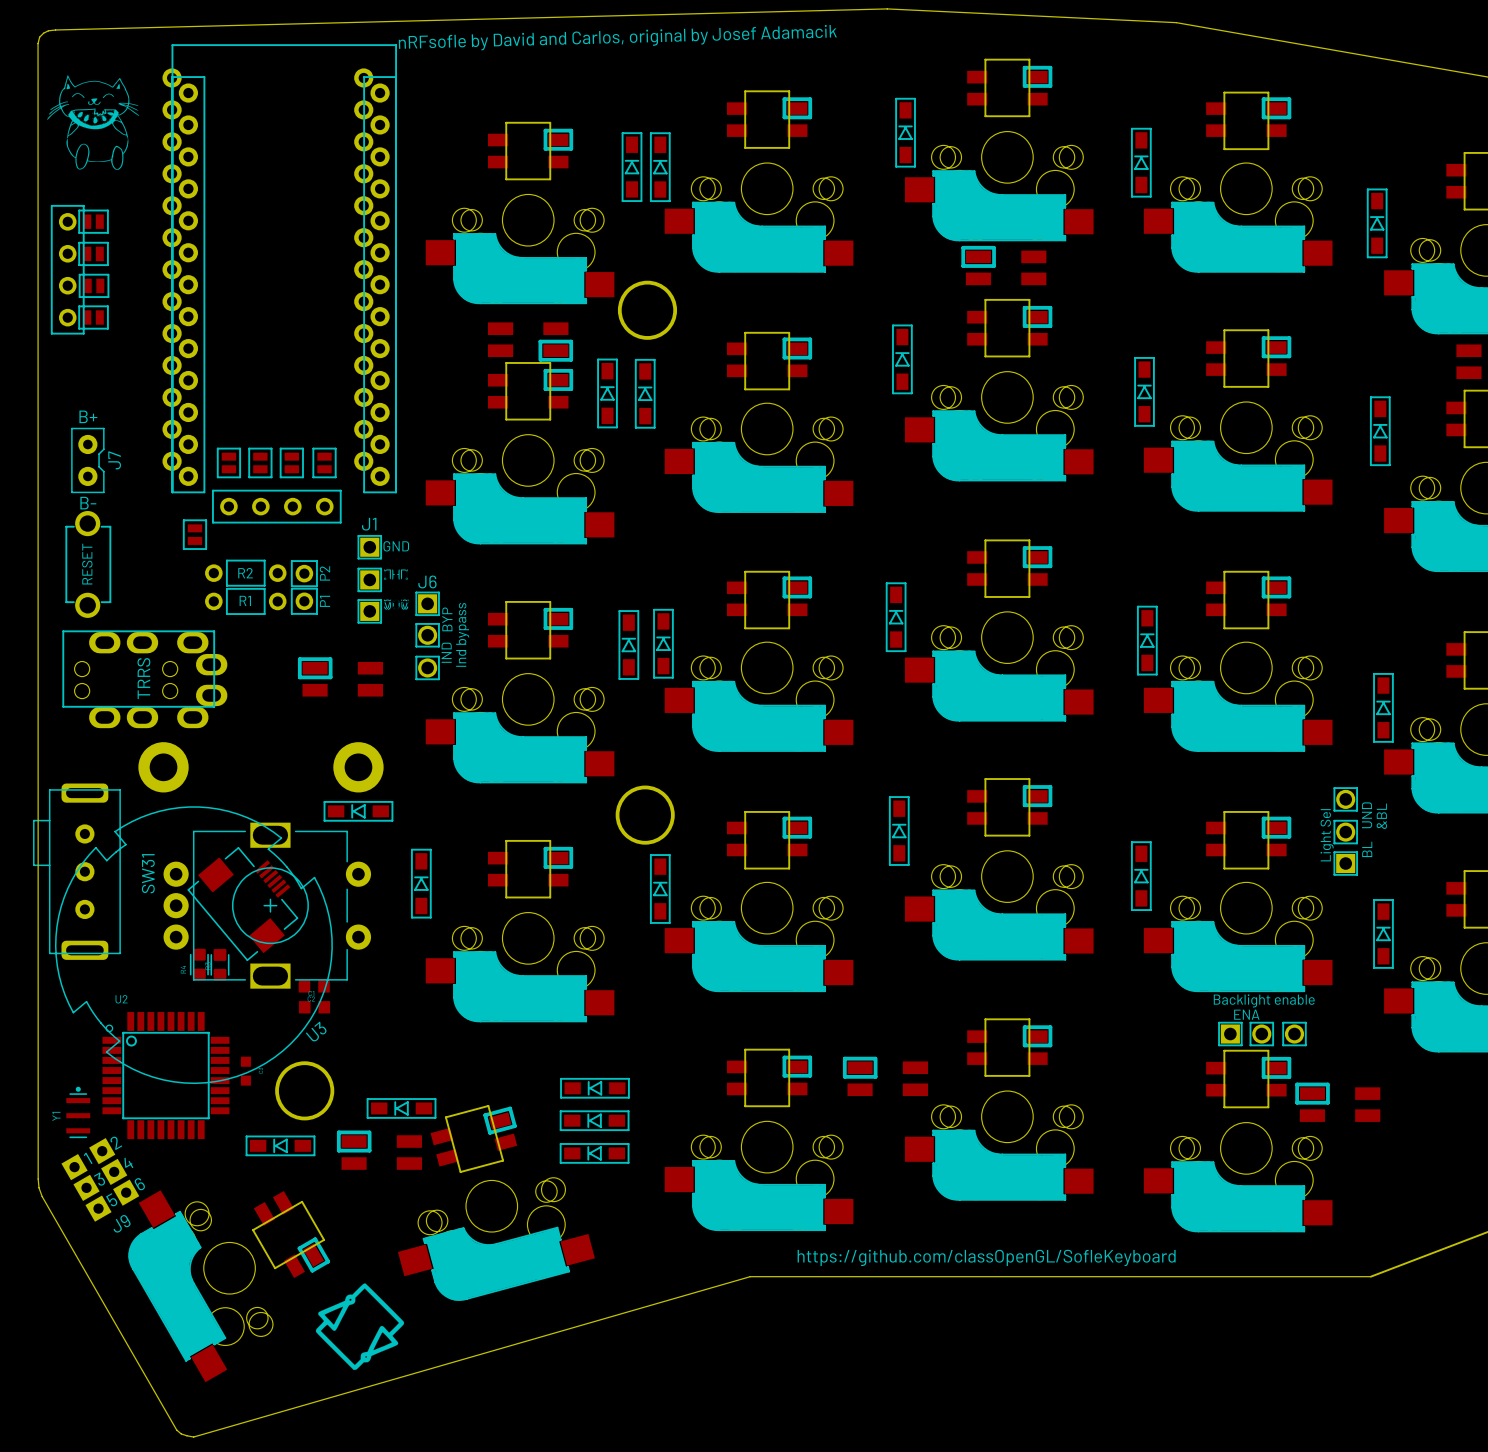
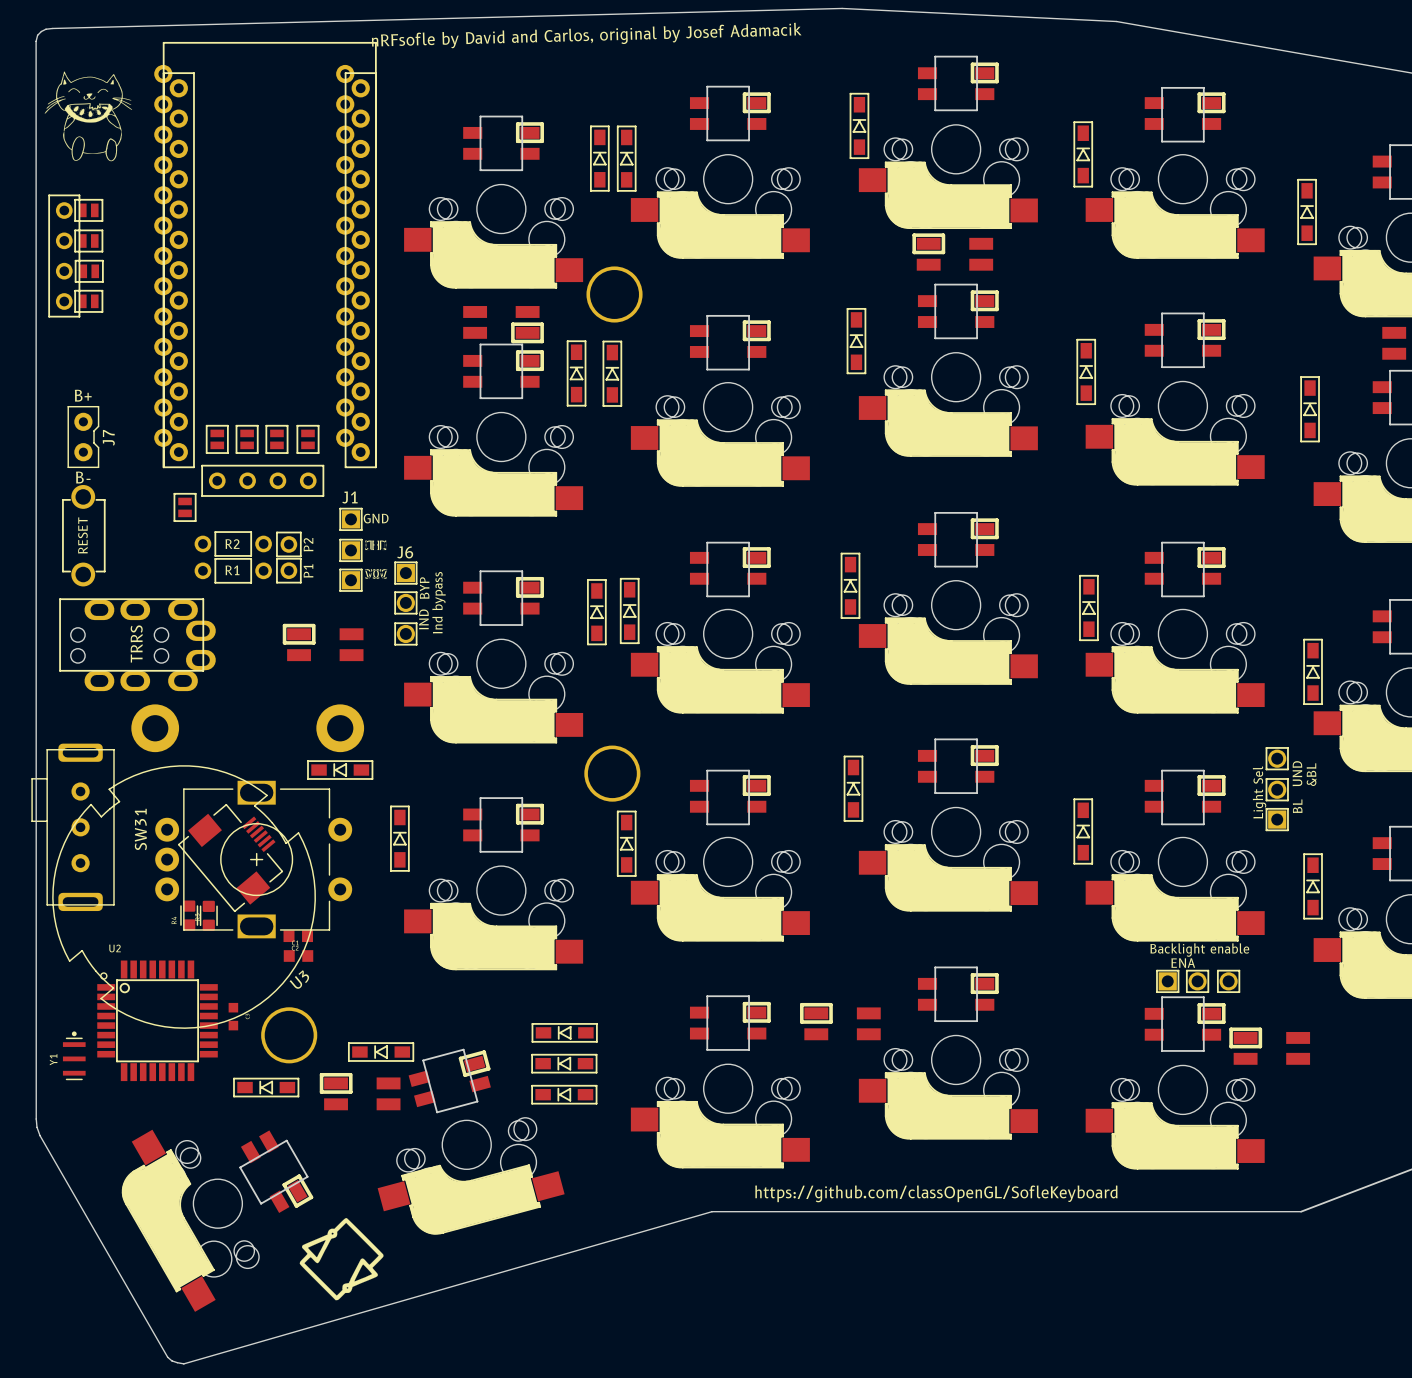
J9: (100, 1179) -> none

